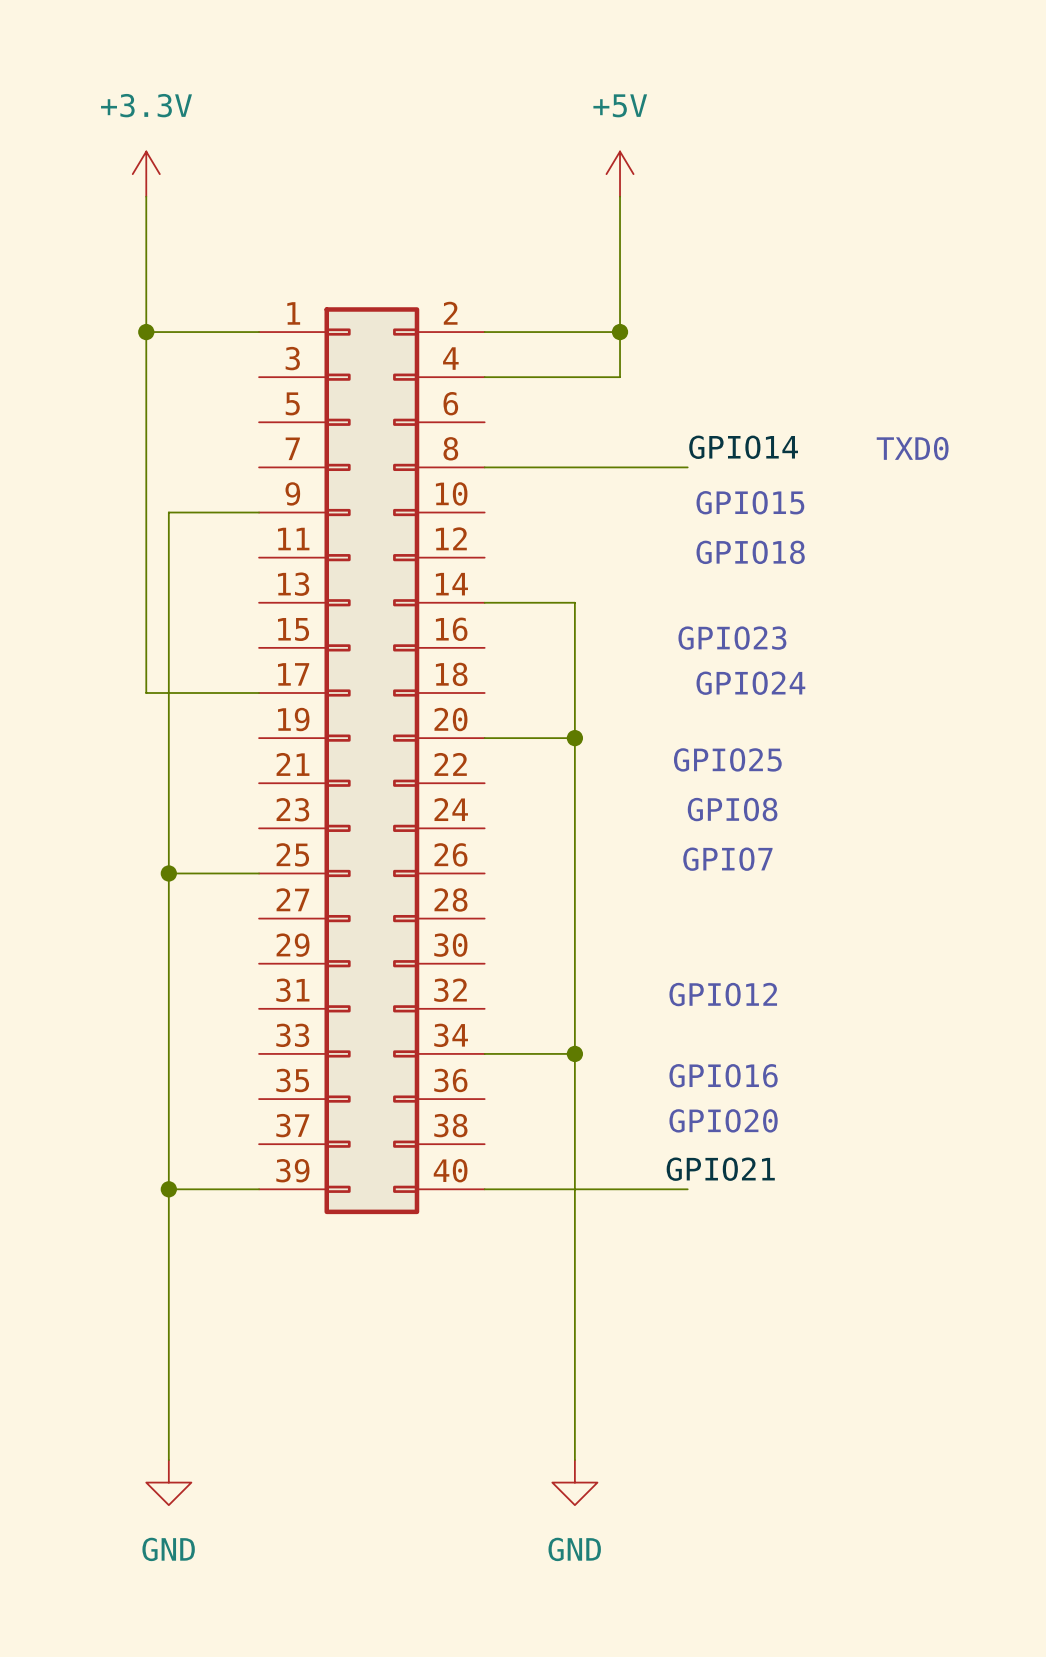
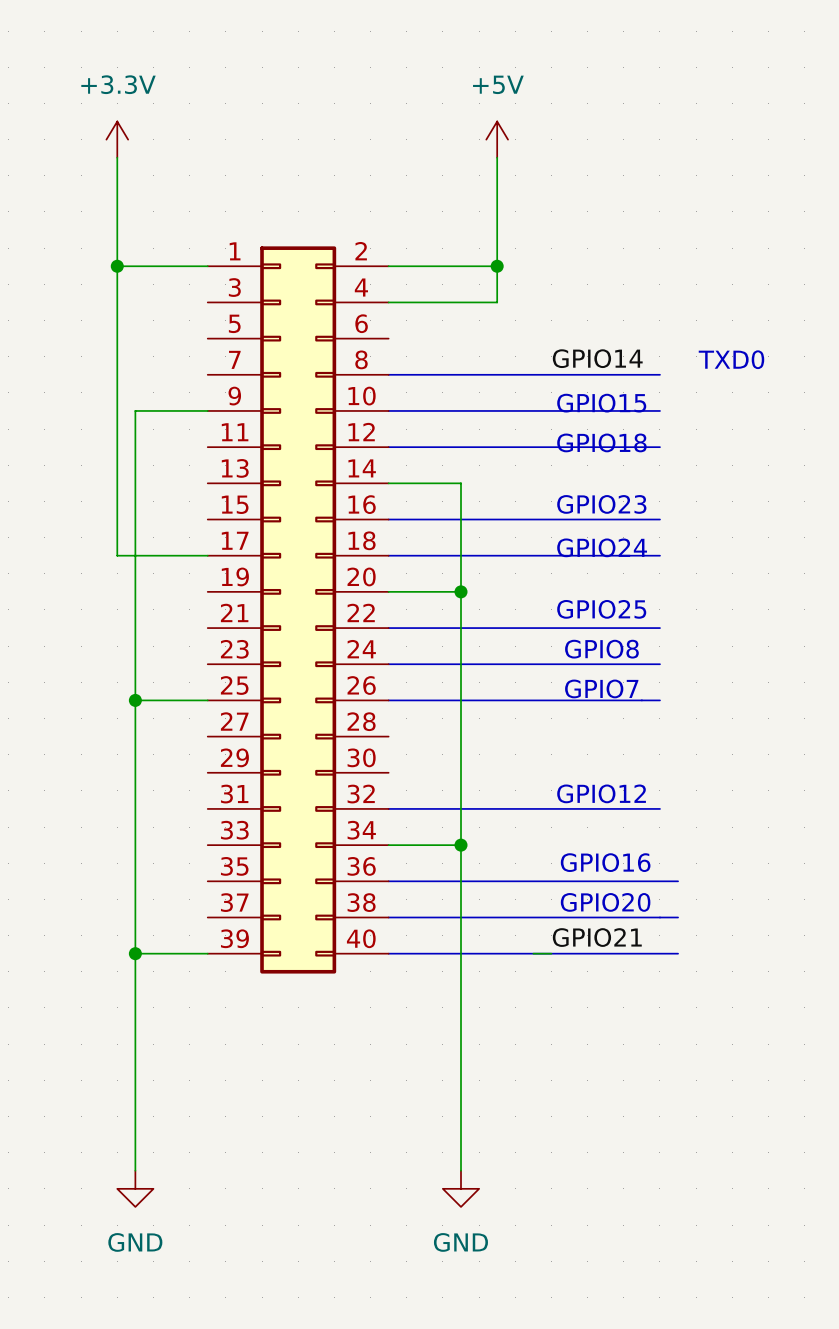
line: none -> (388, 374) (659, 374)
line: none -> (388, 410) (659, 410)
line: none -> (388, 447) (659, 447)
text position: GPIO23 (732, 638) -> GPIO23 (601, 504)
line: none -> (388, 519) (659, 519)
line: none -> (388, 555) (659, 555)
text position: GPIO25 (727, 759) -> GPIO25 (601, 609)
line: none -> (388, 628) (659, 628)
text position: GPIO8 (732, 809) -> GPIO8 (601, 649)
line: none -> (388, 664) (659, 664)
text position: GPIO7 (727, 859) -> GPIO7 (601, 688)
line: none -> (388, 700) (659, 700)
text position: GPIO12 (723, 994) -> GPIO12 (601, 793)
line: none -> (388, 808) (659, 808)
text position: GPIO16 (723, 1075) -> GPIO16 (605, 862)
line: none -> (388, 881) (678, 881)
text position: GPIO20 (723, 1120) -> GPIO20 (605, 902)
line: none -> (388, 917) (678, 917)
label position: GPIO21 (720, 1169) -> GPIO21 (597, 937)
line: none -> (388, 953) (678, 953)

